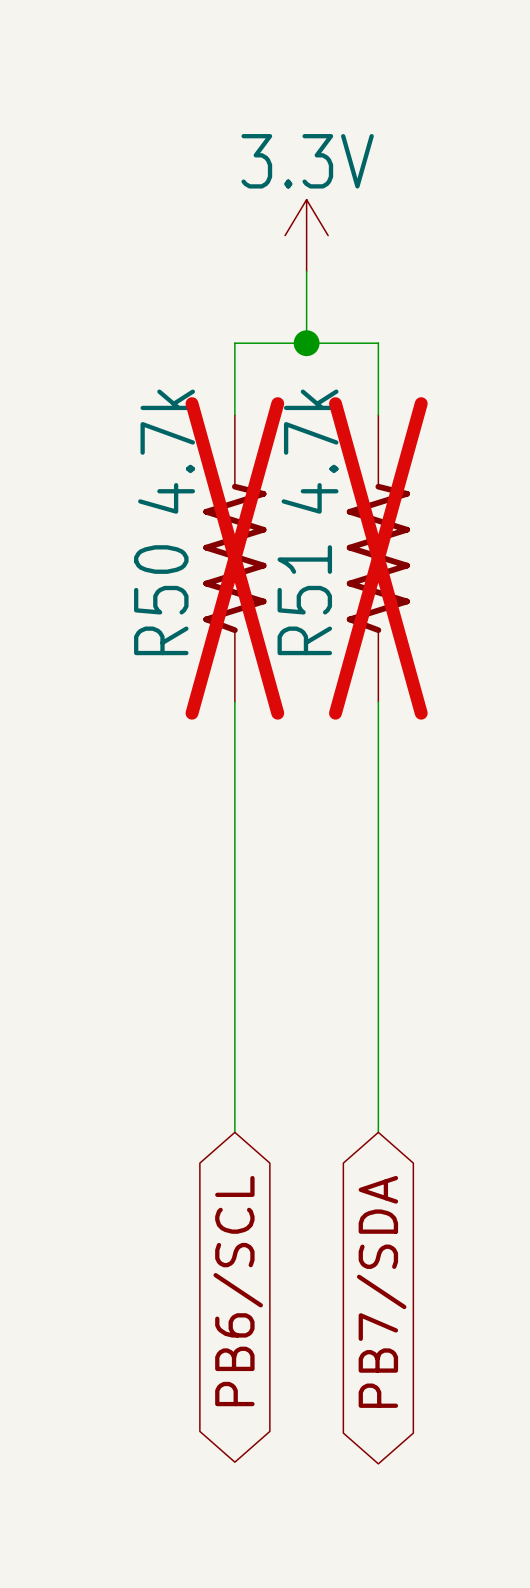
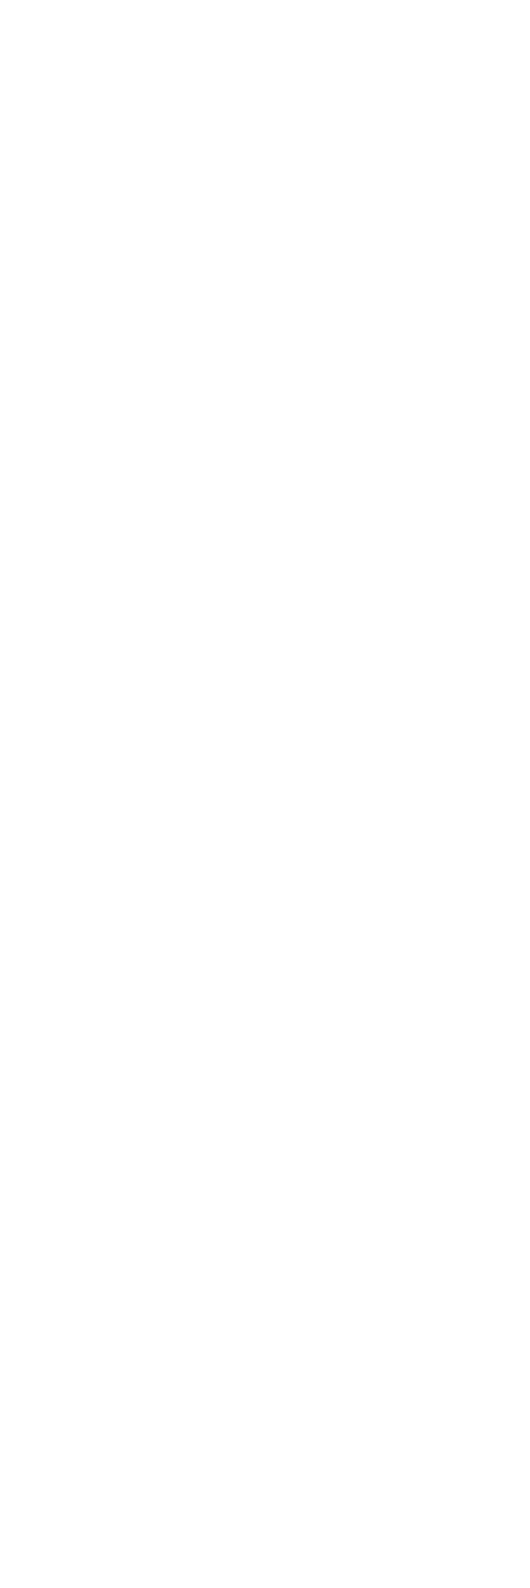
power symbol: 3.3V (306, 235) -> none
wire: (306, 271) (306, 343) -> none
junction: (306, 343) -> none
wire: (234, 414) (234, 343) (378, 343) (378, 414) -> none
R50: 4.7k (234, 558) -> none
R51: 4.7k (378, 558) -> none
wire: (234, 701) (234, 1132) -> none
wire: (378, 701) (378, 1132) -> none
global label: PB6/SCL (238, 1291) -> none
global label: PB7/SDA (381, 1291) -> none

